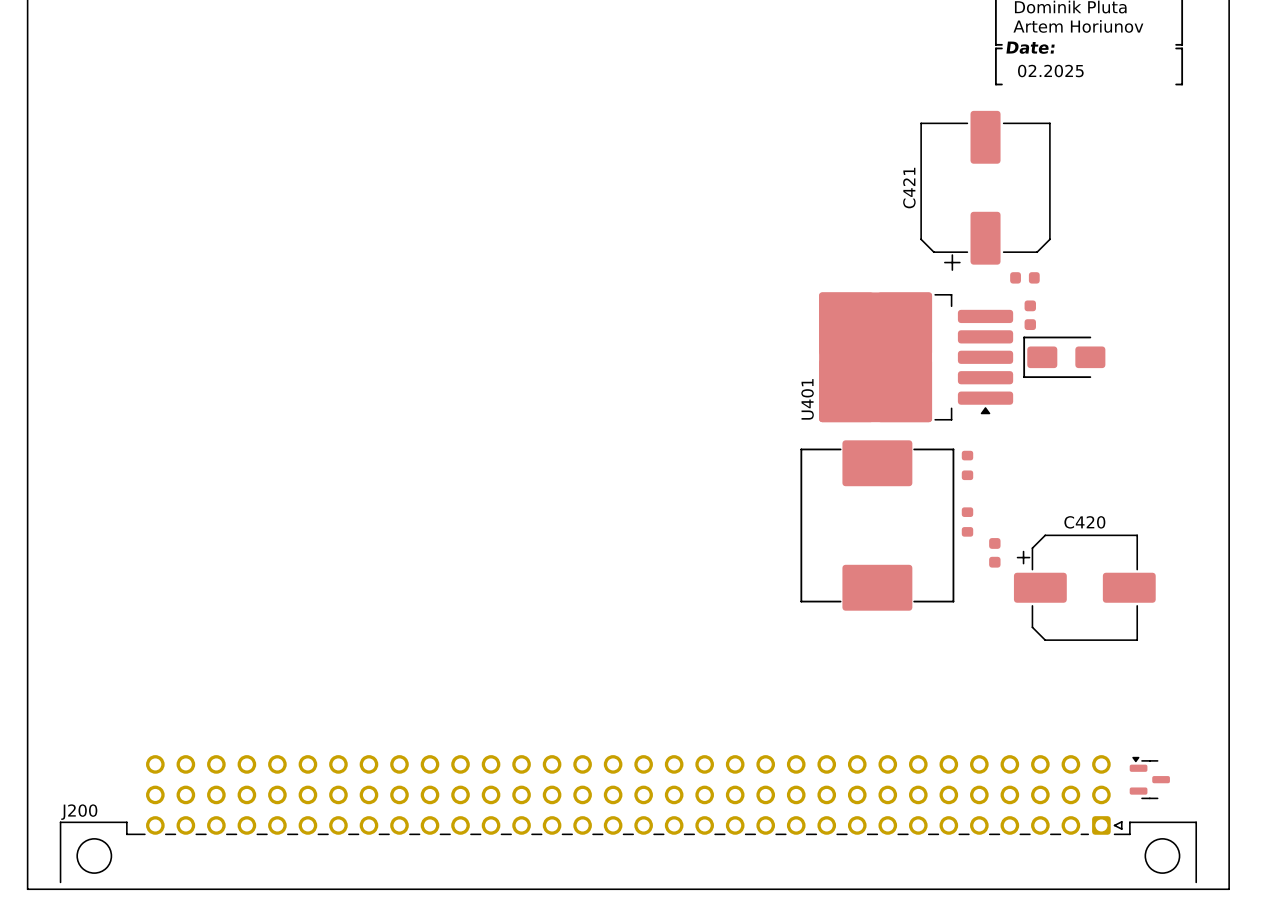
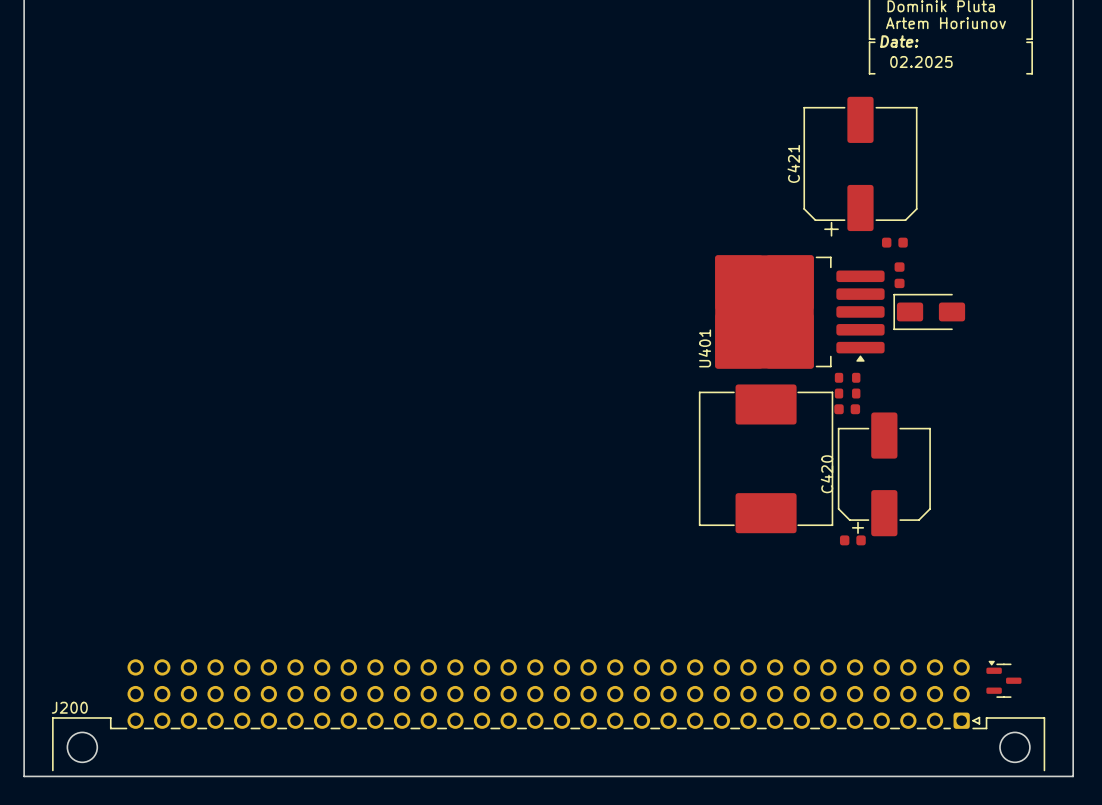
part: none -> (847, 377)
part footprint: [961, 450, 974, 481] -> [834, 404, 861, 415]
part: none -> (847, 393)
part: (967, 522) -> none
part rotation: 0° (994, 552) -> 90° clockwise (852, 540)
part position: (994, 552) -> (852, 540)
C420 rotation: 0° (1084, 587) -> 90° counterclockwise (884, 474)

